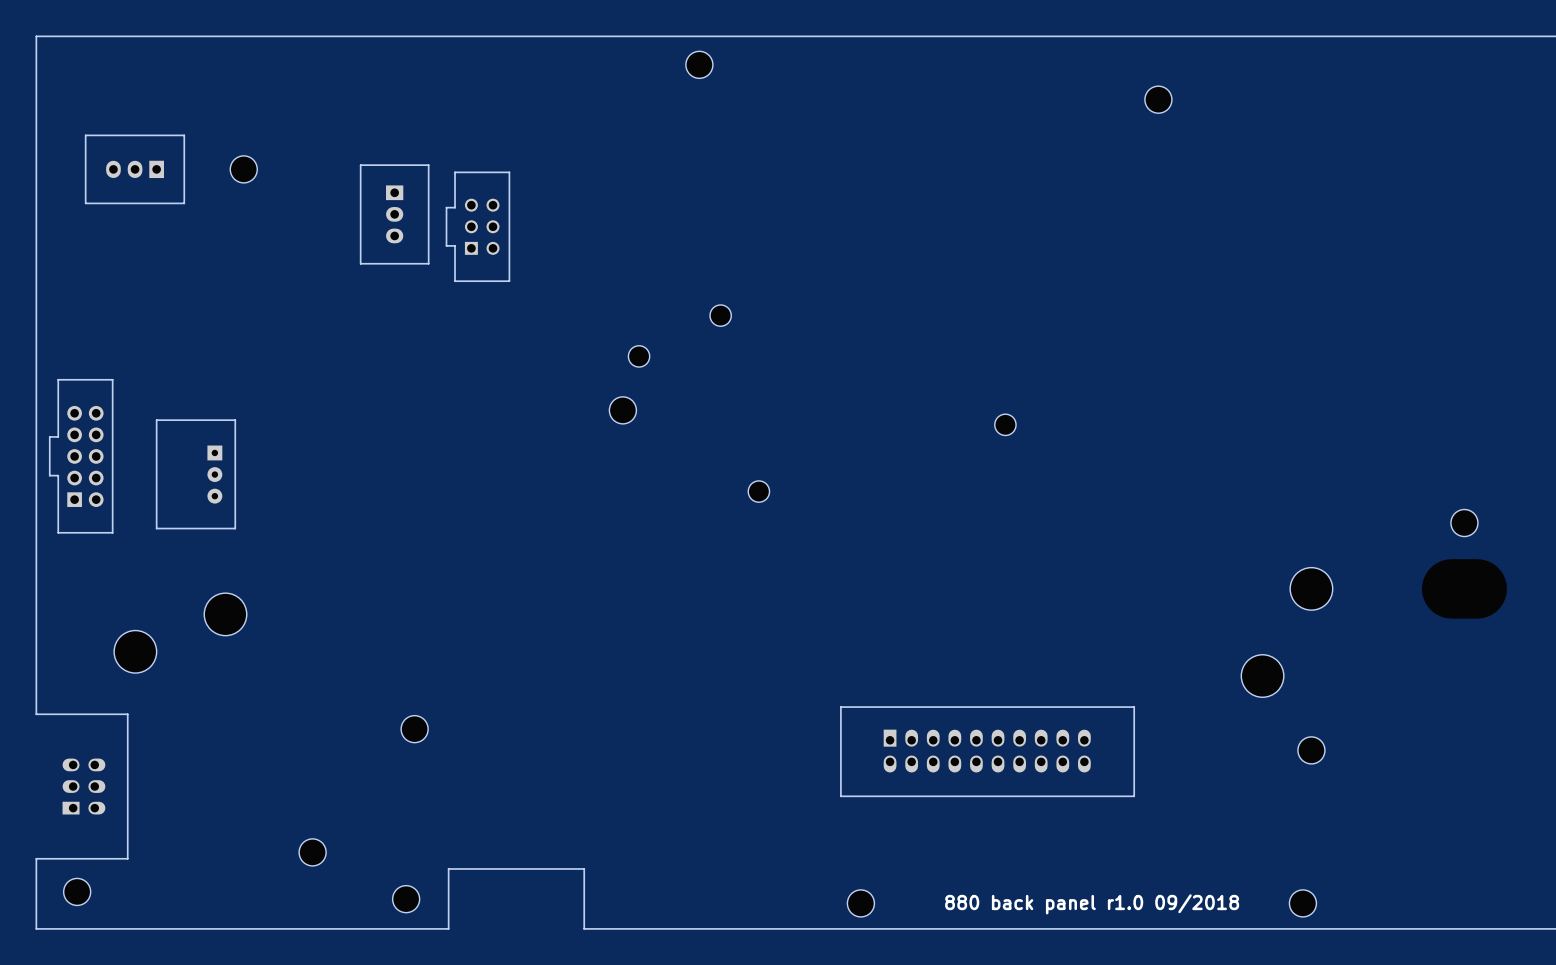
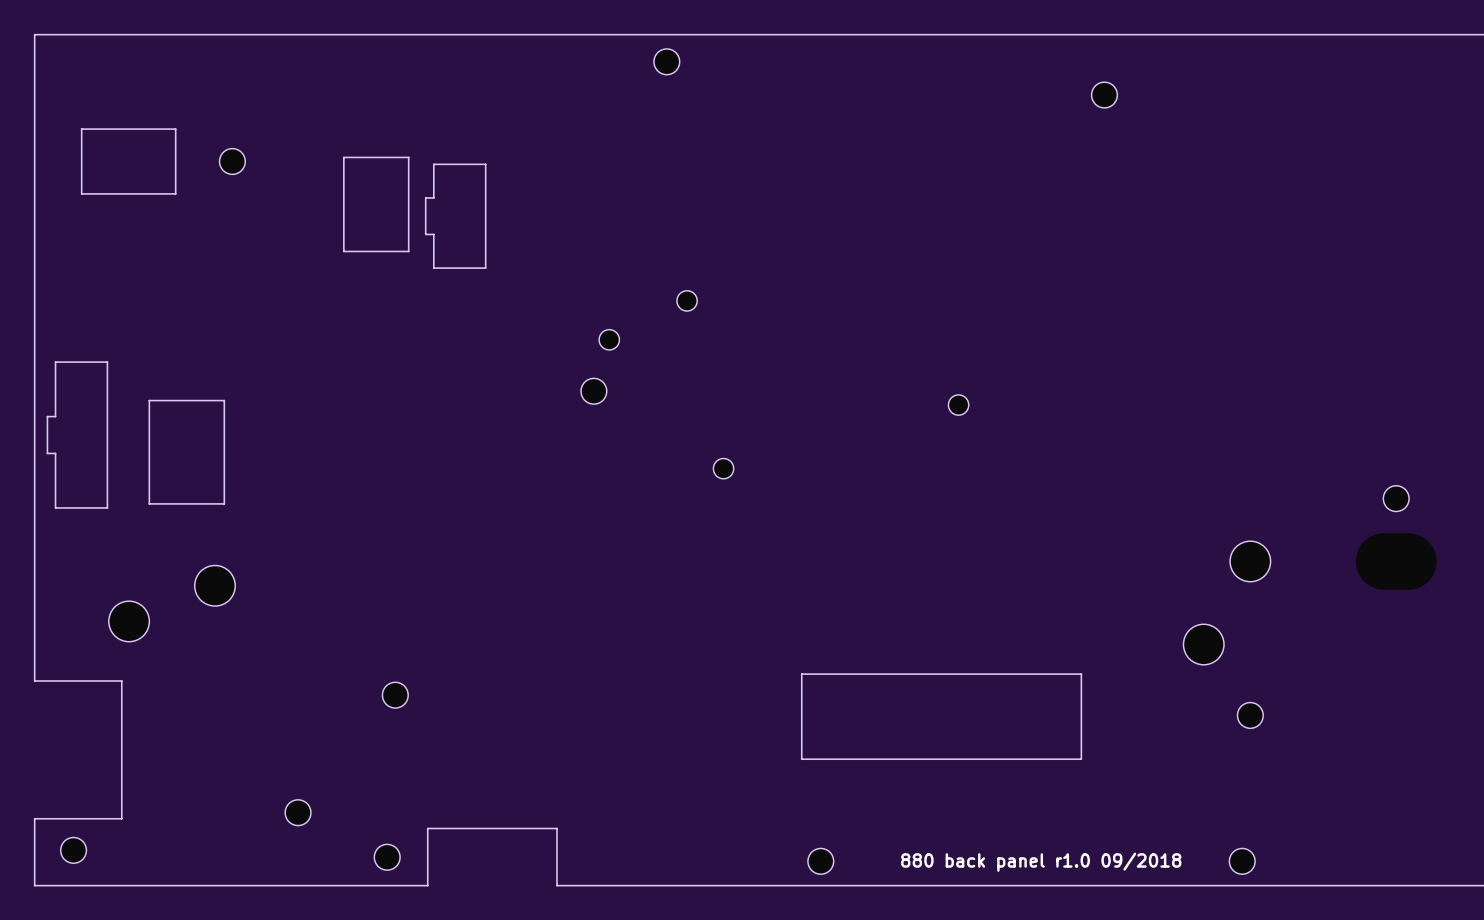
part: (135, 169) -> none
part: (394, 214) -> none
part: (482, 226) -> none
part: (85, 456) -> none
part: (214, 474) -> none
part: (987, 751) -> none
part: (83, 786) -> none

